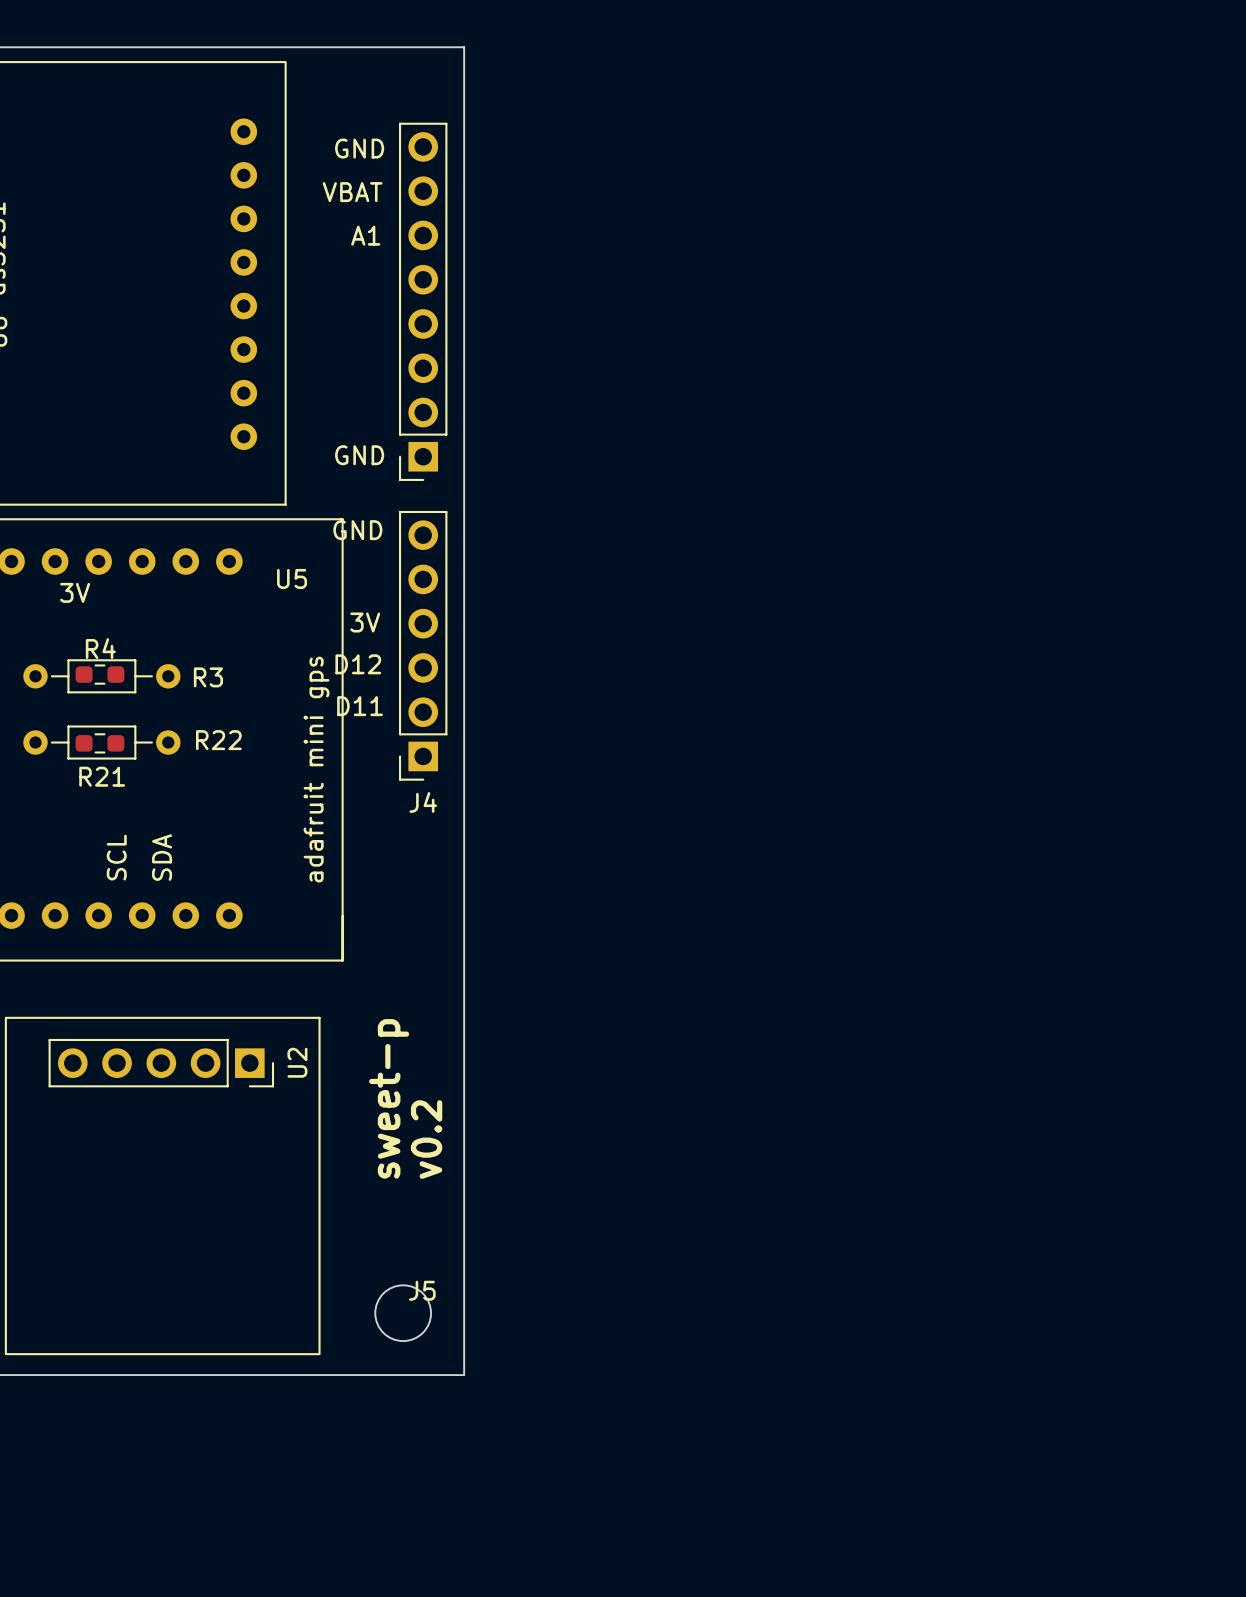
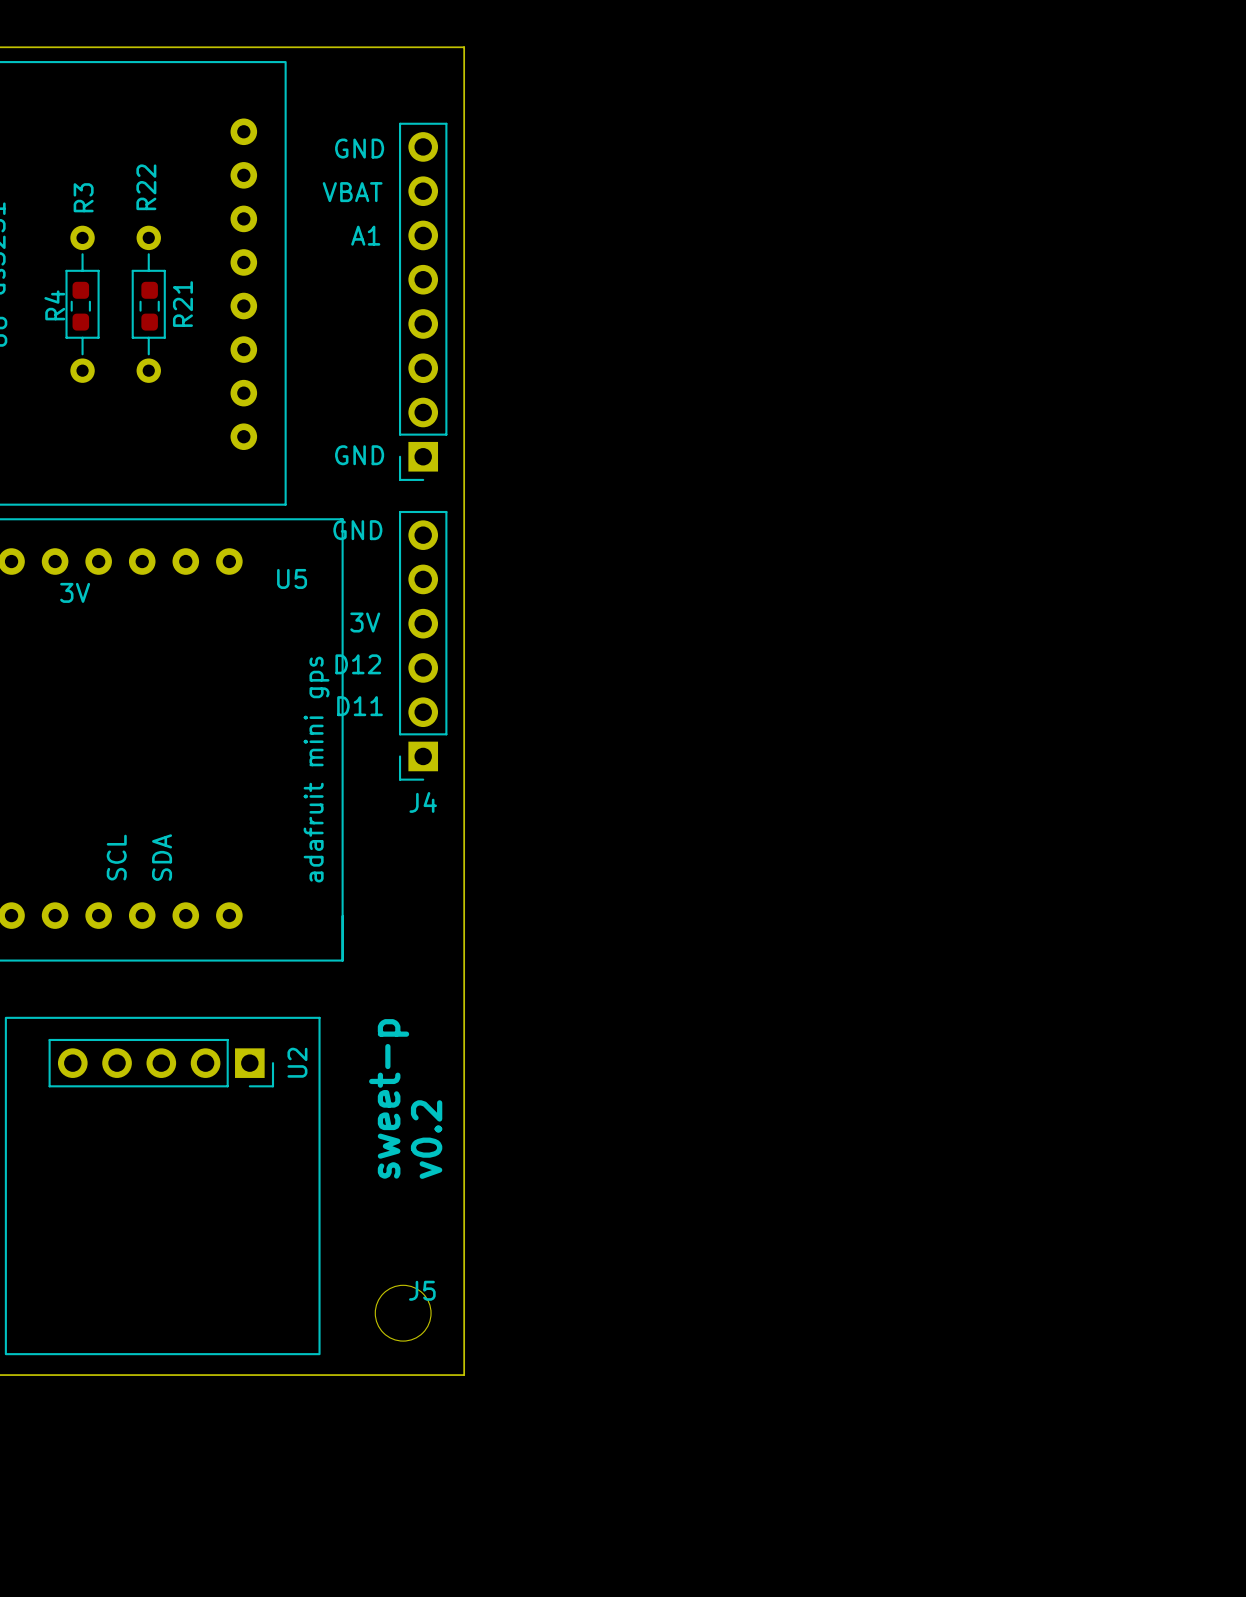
R4 name position: R4 (100, 648) -> R4 (54, 305)
R4 rotation: 0° (99, 674) -> 90° clockwise (80, 306)
R4 position: (99, 674) -> (80, 306)
R3 rotation: 0° (101, 676) -> 90° clockwise (82, 304)
R3 position: (101, 676) -> (82, 304)
R3 name position: R3 (208, 677) -> R3 (83, 197)
R22 name position: R22 (218, 740) -> R22 (146, 187)
R22 rotation: 0° (101, 742) -> 90° clockwise (148, 304)
R22 position: (101, 742) -> (148, 304)
R21 rotation: 0° (99, 743) -> 90° clockwise (149, 306)
R21 position: (99, 743) -> (149, 306)
R21 name position: R21 (102, 776) -> R21 (182, 304)

